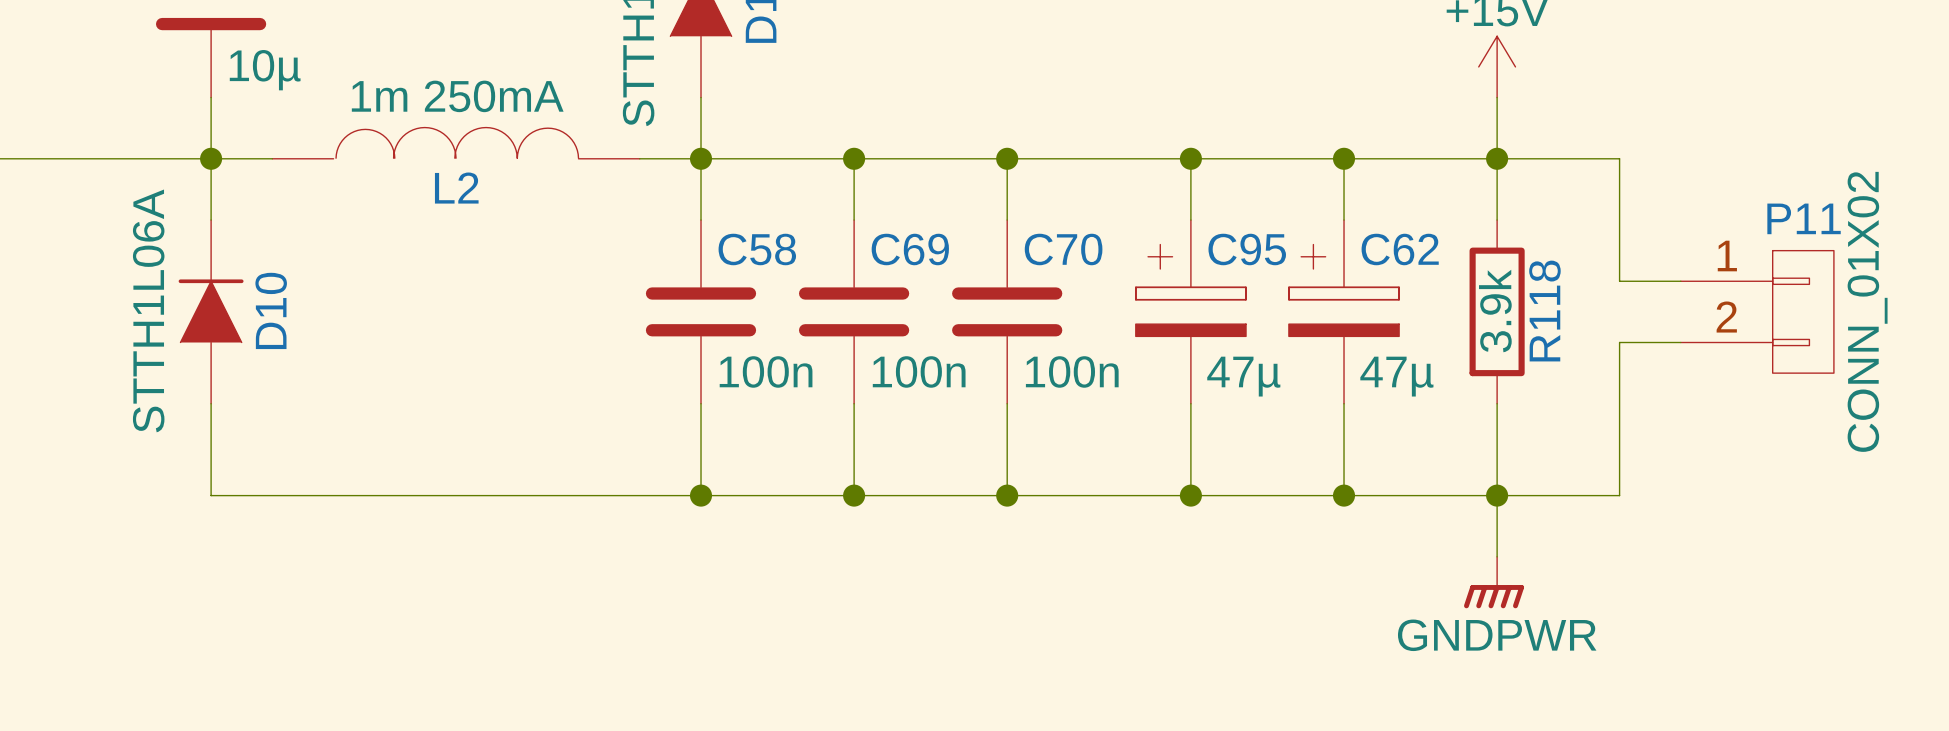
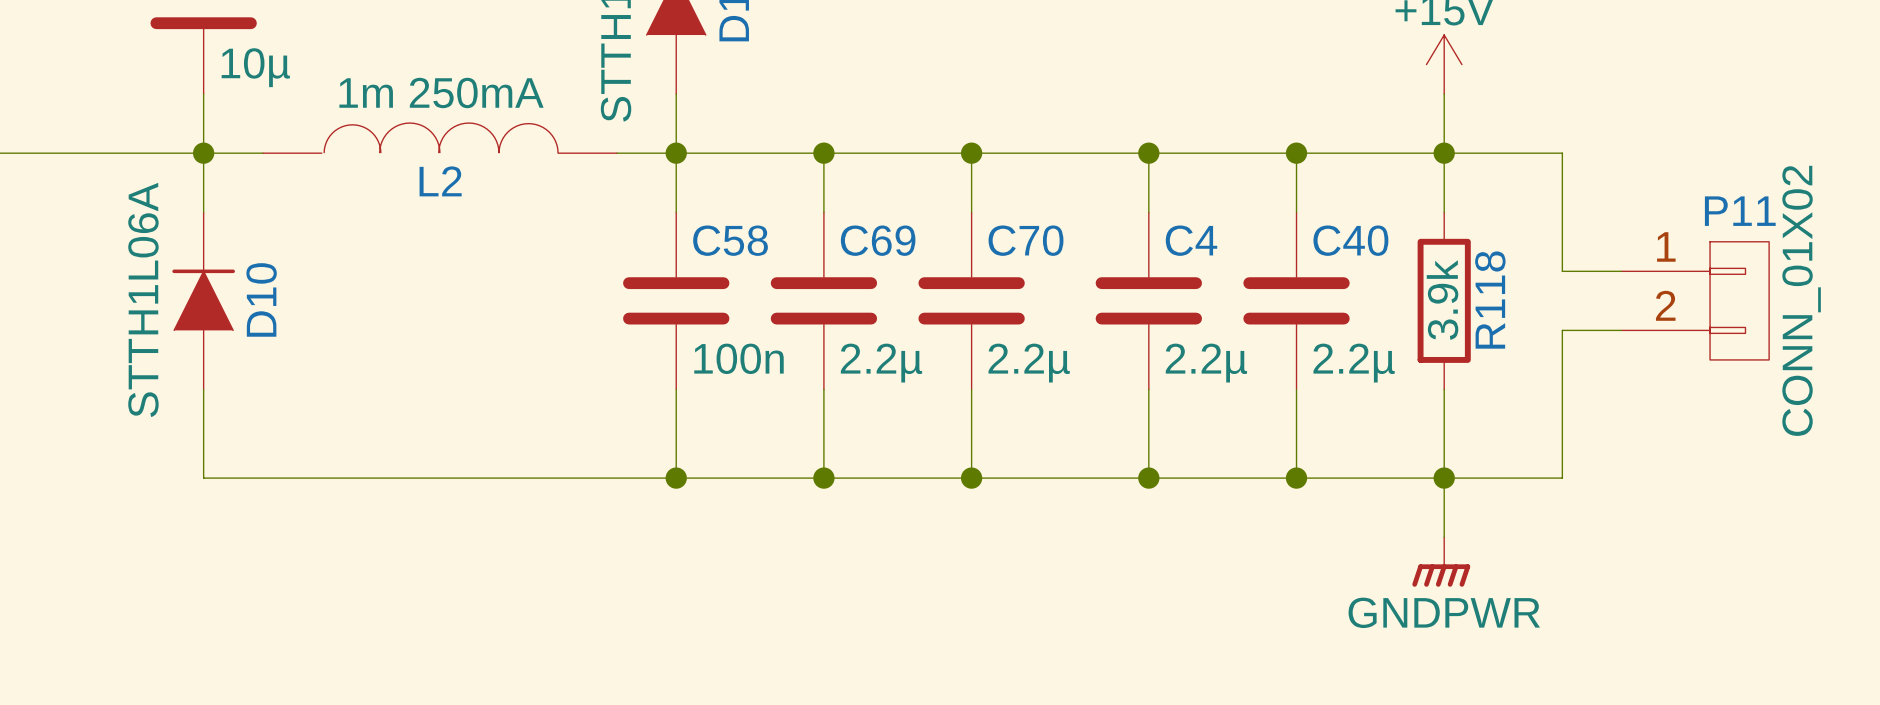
C95: 47µ (1190, 311) -> none
C4: none -> 2.2µ (1148, 300)
C62: 47µ (1344, 311) -> none
C40: none -> 2.2µ (1296, 300)
C69 value: 100n (919, 371) -> 2.2µ (881, 363)
C70 value: 100n (1072, 371) -> 2.2µ (1029, 363)

